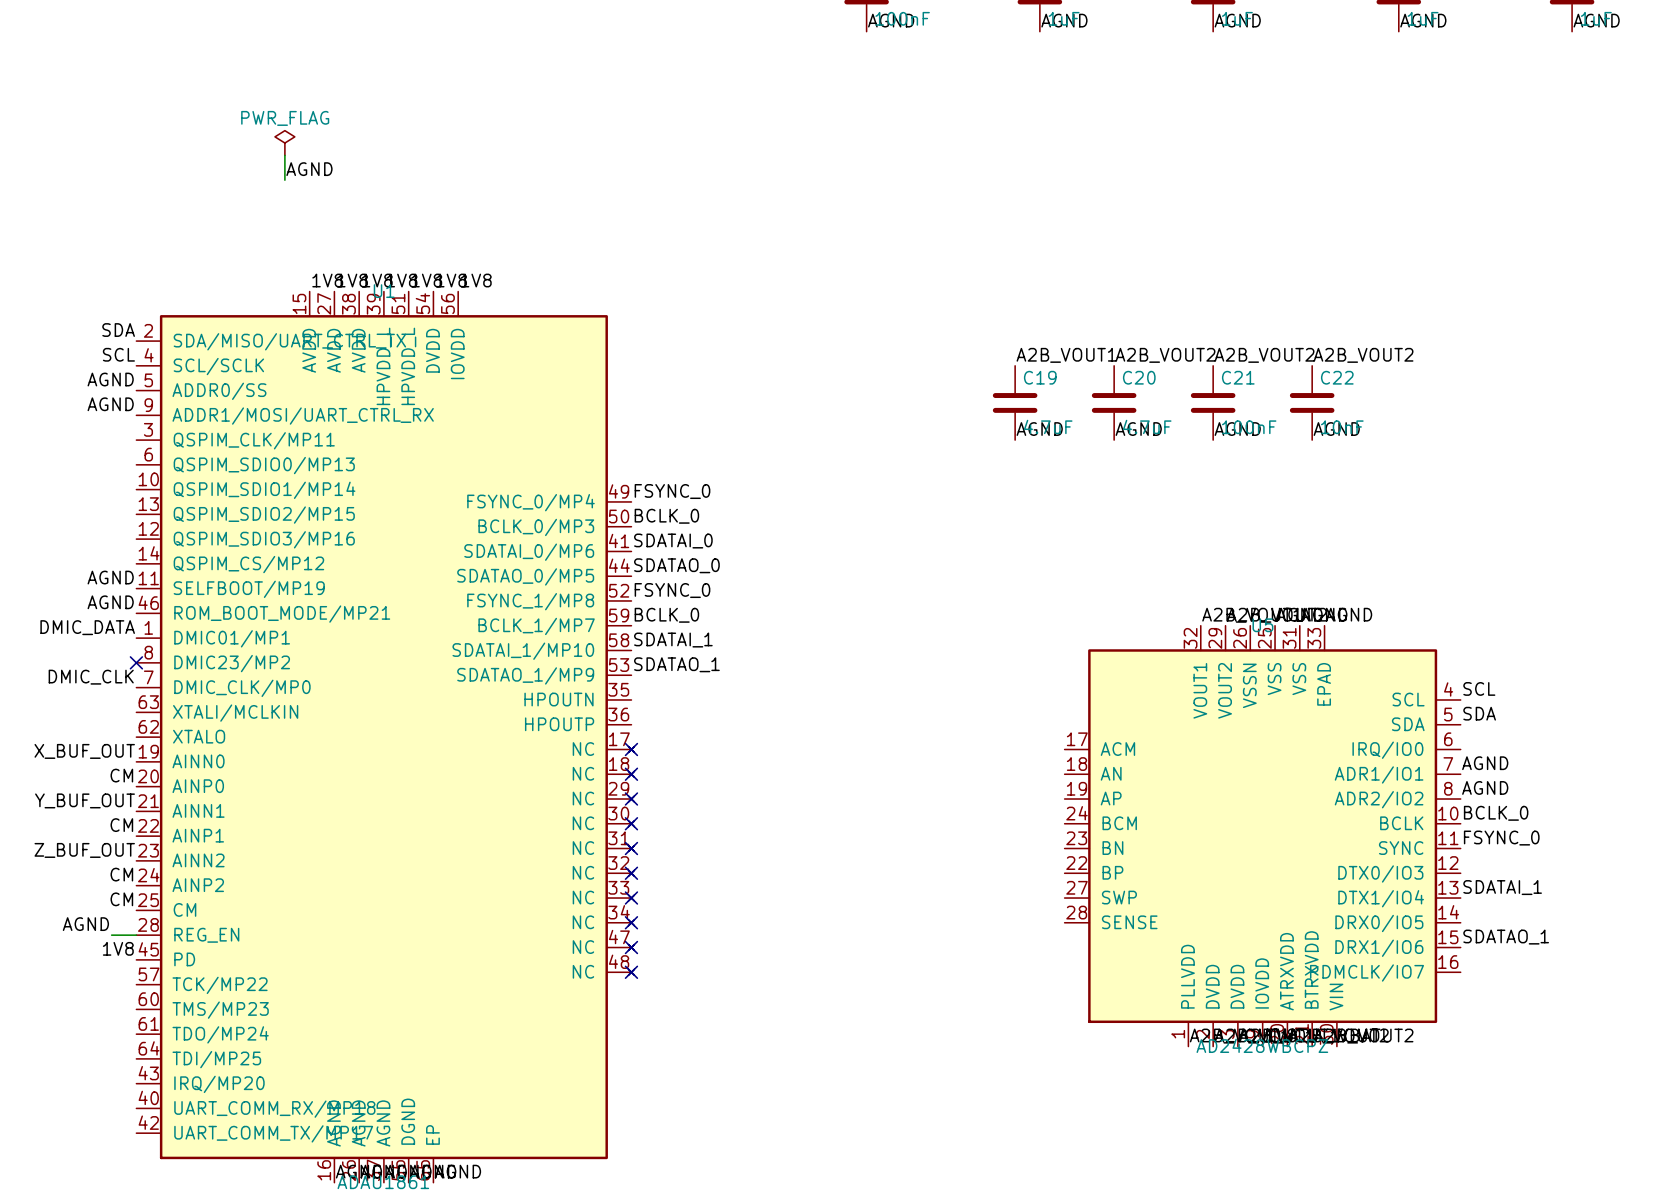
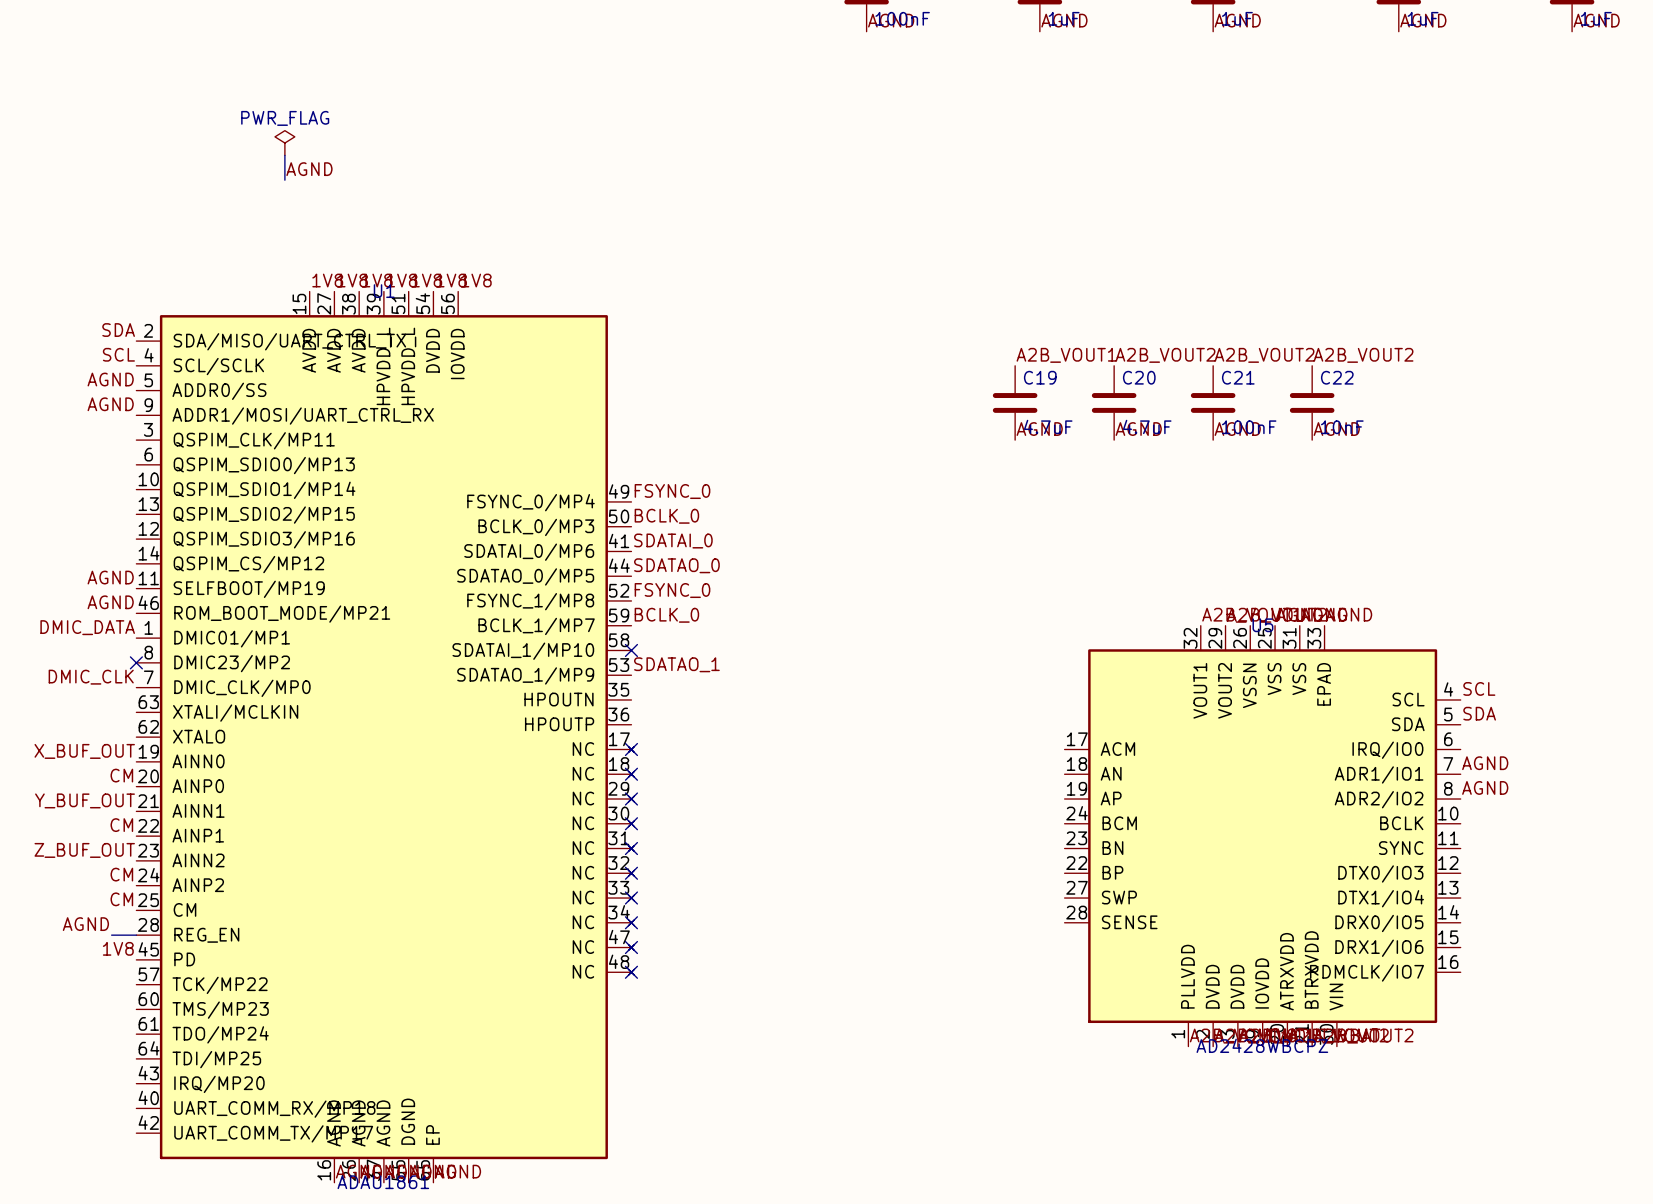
label: SDATAI_1 (673, 640) -> none
no-connect mark: none -> (631, 650)
label: BCLK_0 (1496, 813) -> none
label: FSYNC_0 (1501, 838) -> none
label: SDATAI_1 (1502, 887) -> none
label: SDATAO_1 (1506, 937) -> none

